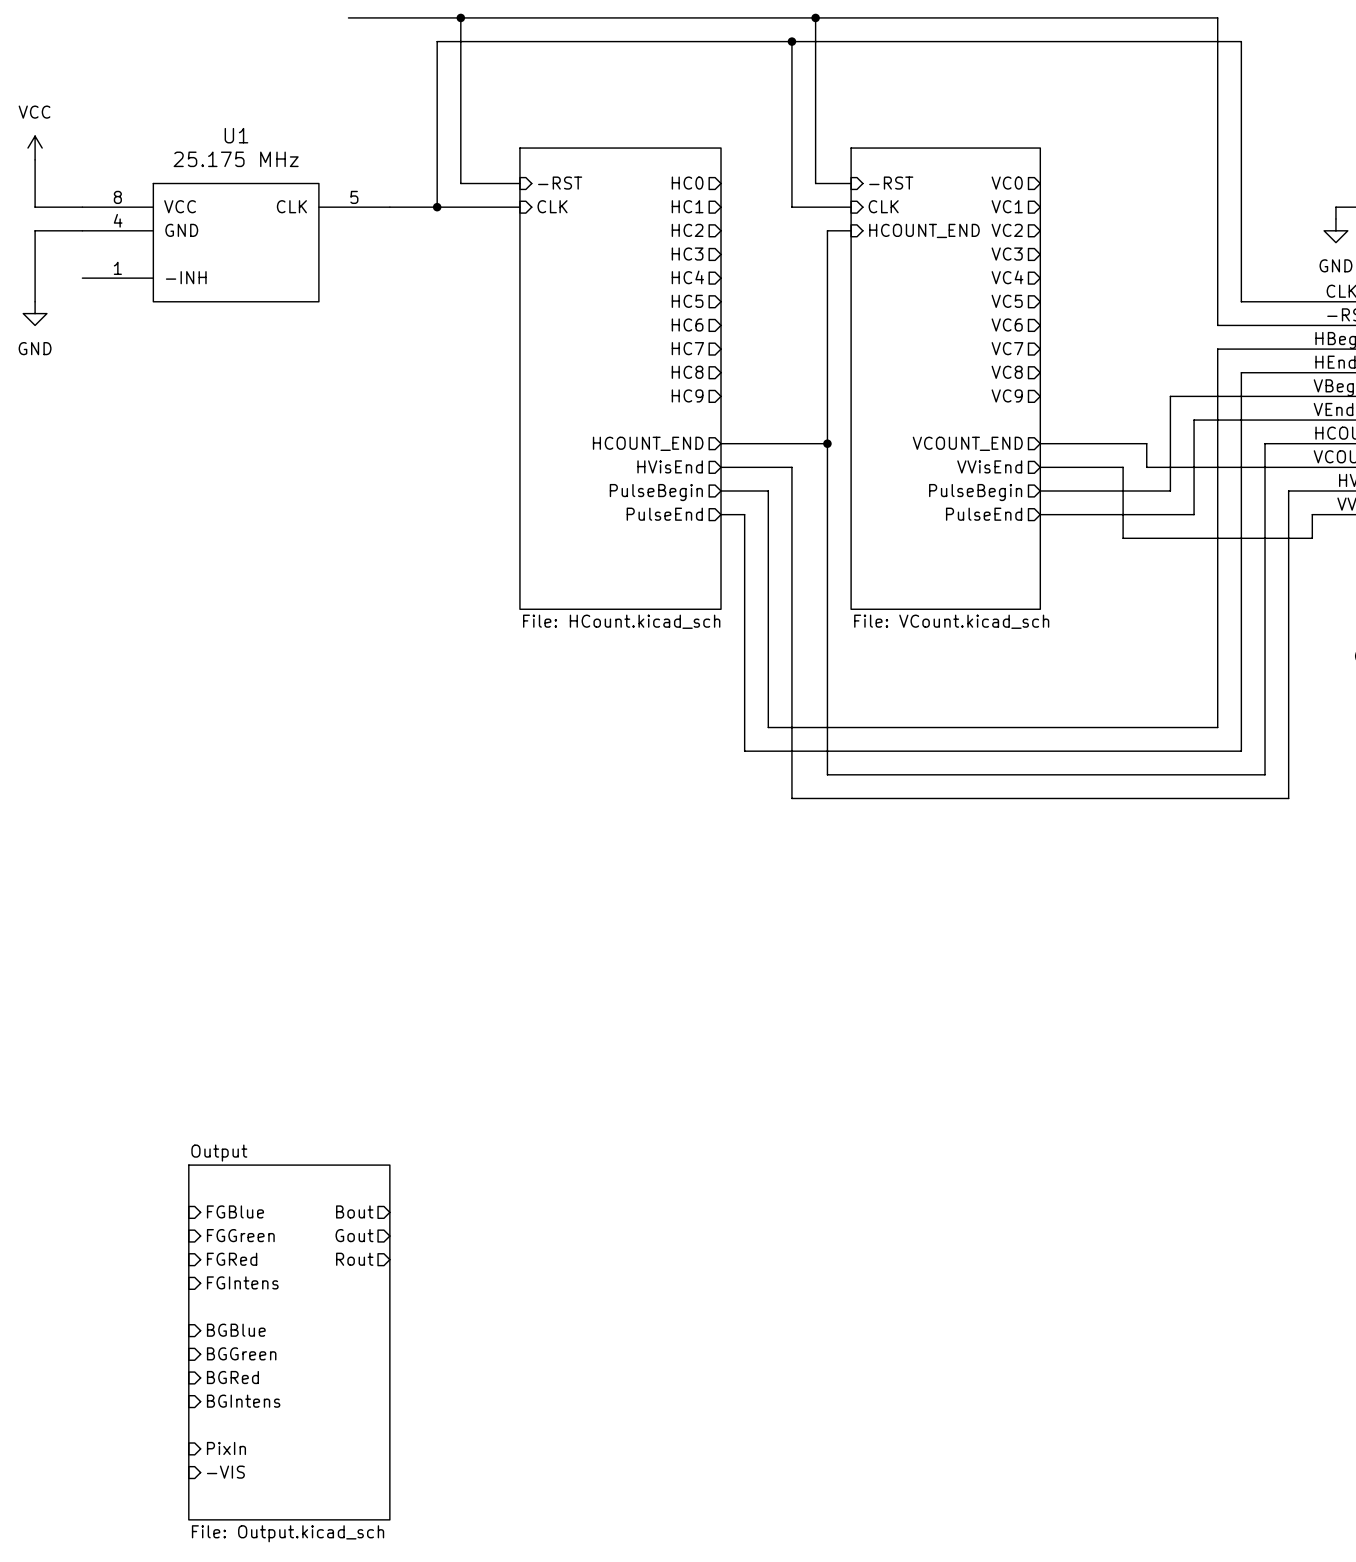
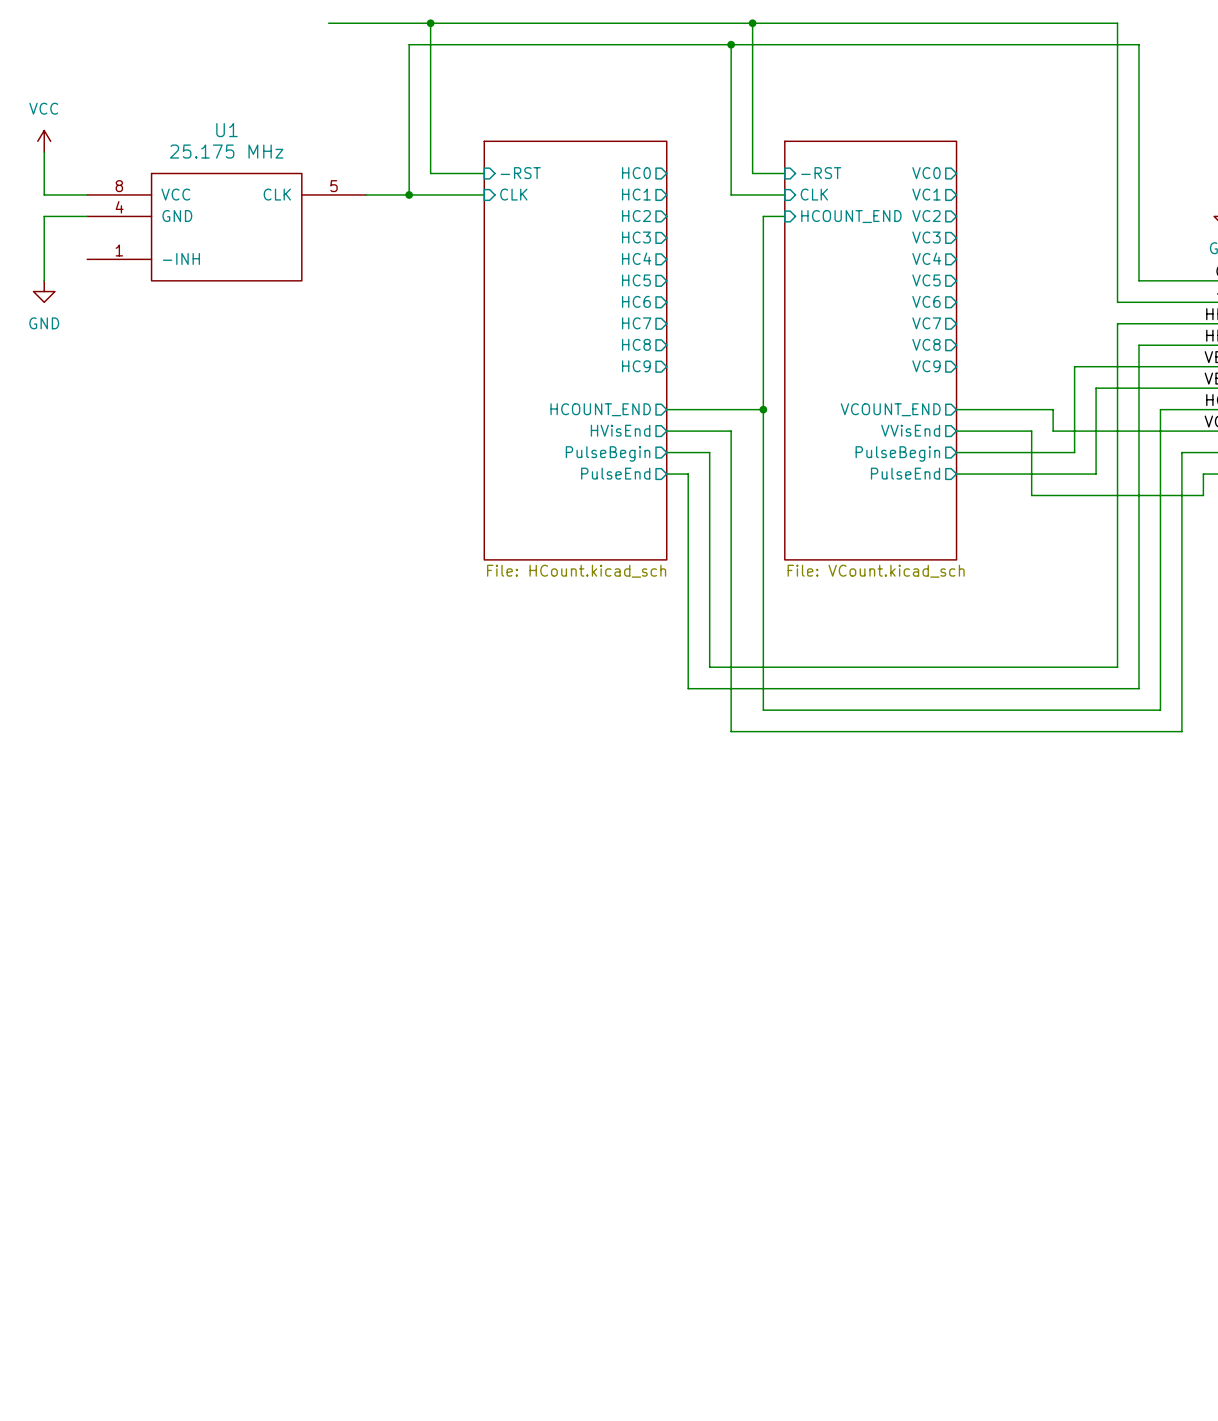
sheet pin: FGBlue (235, 1211) -> none
sheet pin: Bout (354, 1211) -> none
sheet pin: FGGreen (240, 1235) -> none
sheet pin: Gout (354, 1235) -> none
sheet pin: FGRed (232, 1259) -> none
sheet pin: Rout (354, 1259) -> none
sheet pin: FGIntens (242, 1282) -> none
sheet pin: BGBlue (236, 1330) -> none
sheet Output: File: Output.kicad_sch (289, 1342) -> none
sheet pin: BGGreen (241, 1353) -> none
sheet pin: BGRed (232, 1377) -> none
sheet pin: BGIntens (243, 1401) -> none
sheet pin: PixIn (226, 1448) -> none
sheet pin: -VIS (225, 1472) -> none

